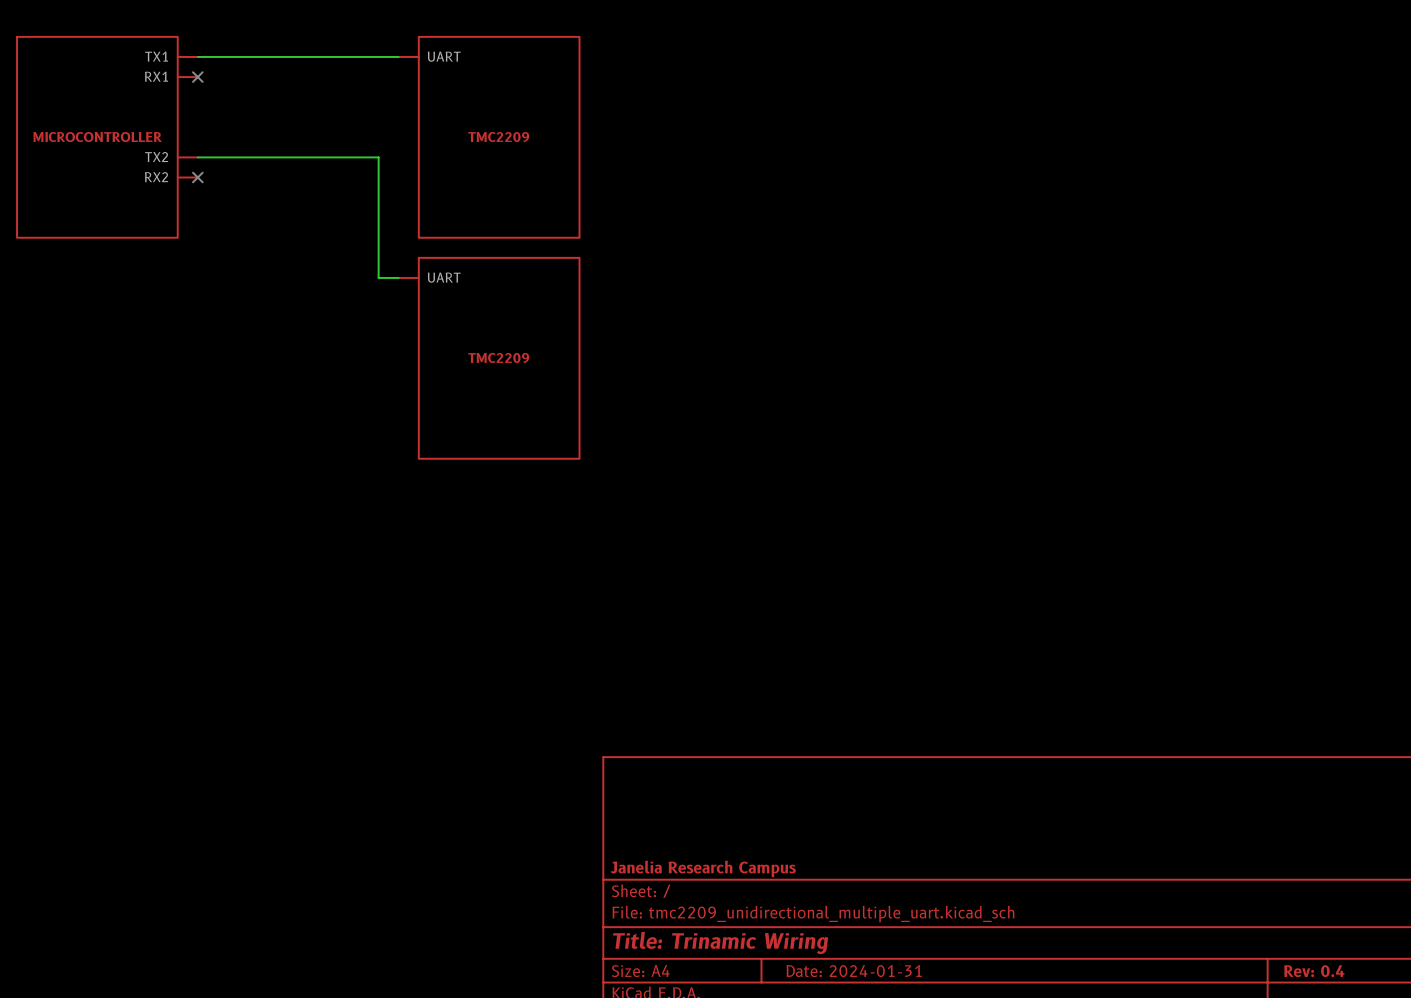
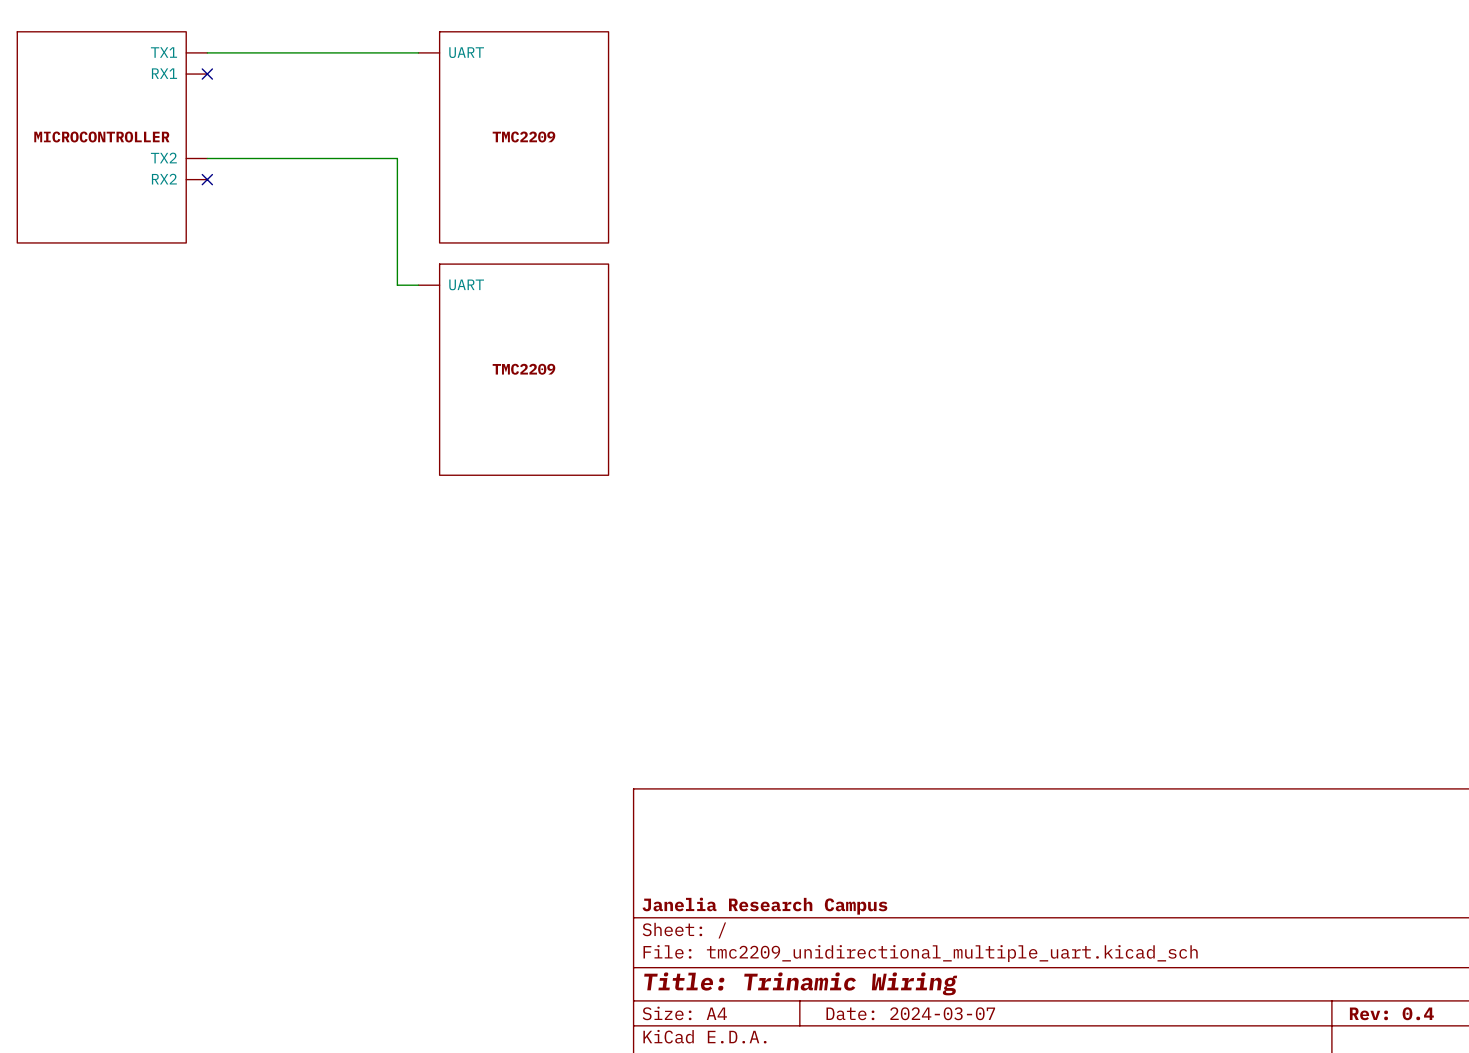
title block: Date: 2024-01-31 (854, 971) -> Date: 2024-03-07 (910, 1013)

